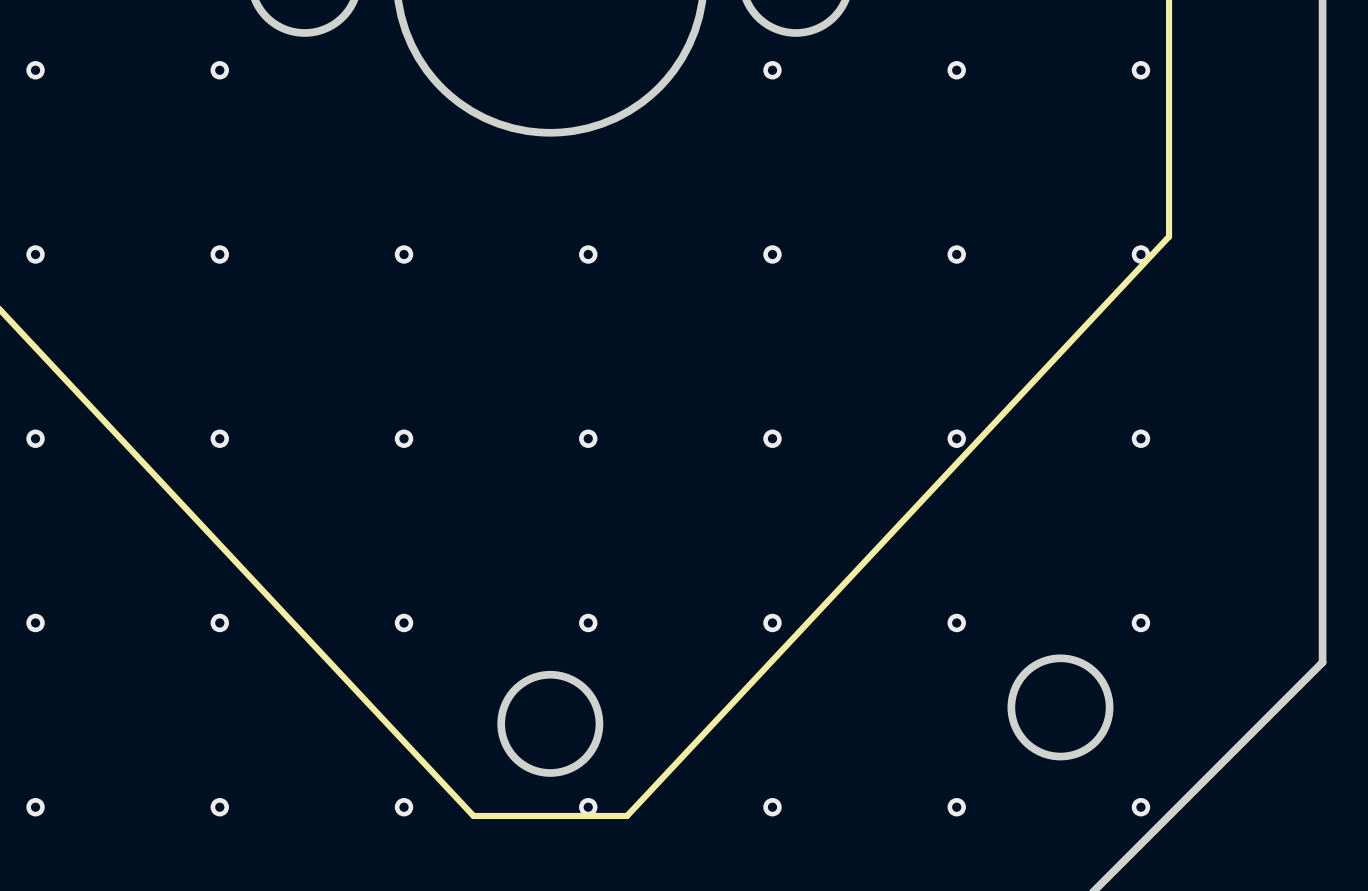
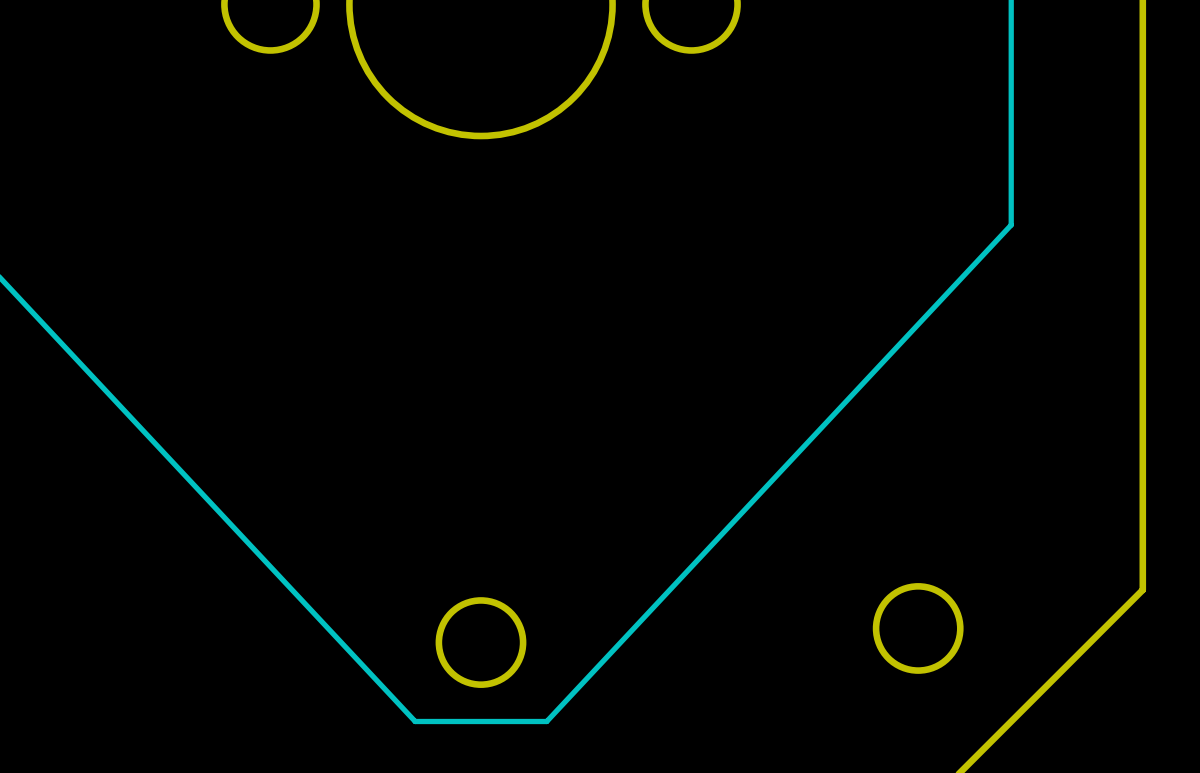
via: (35, 70) -> none
via: (219, 70) -> none
via: (772, 70) -> none
via: (956, 70) -> none
via: (1140, 70) -> none
via: (35, 254) -> none
via: (219, 254) -> none
via: (404, 254) -> none
via: (588, 254) -> none
via: (772, 254) -> none
via: (956, 254) -> none
via: (1140, 254) -> none
via: (35, 438) -> none
via: (219, 438) -> none
via: (404, 438) -> none
via: (588, 438) -> none
via: (772, 438) -> none
via: (956, 438) -> none
via: (1140, 438) -> none
via: (35, 622) -> none
via: (219, 622) -> none
via: (404, 622) -> none
via: (588, 622) -> none
via: (772, 622) -> none
via: (956, 622) -> none
via: (1140, 622) -> none
via: (35, 807) -> none
via: (219, 807) -> none
via: (404, 807) -> none
via: (588, 807) -> none
via: (772, 807) -> none
via: (956, 807) -> none
via: (1140, 807) -> none

